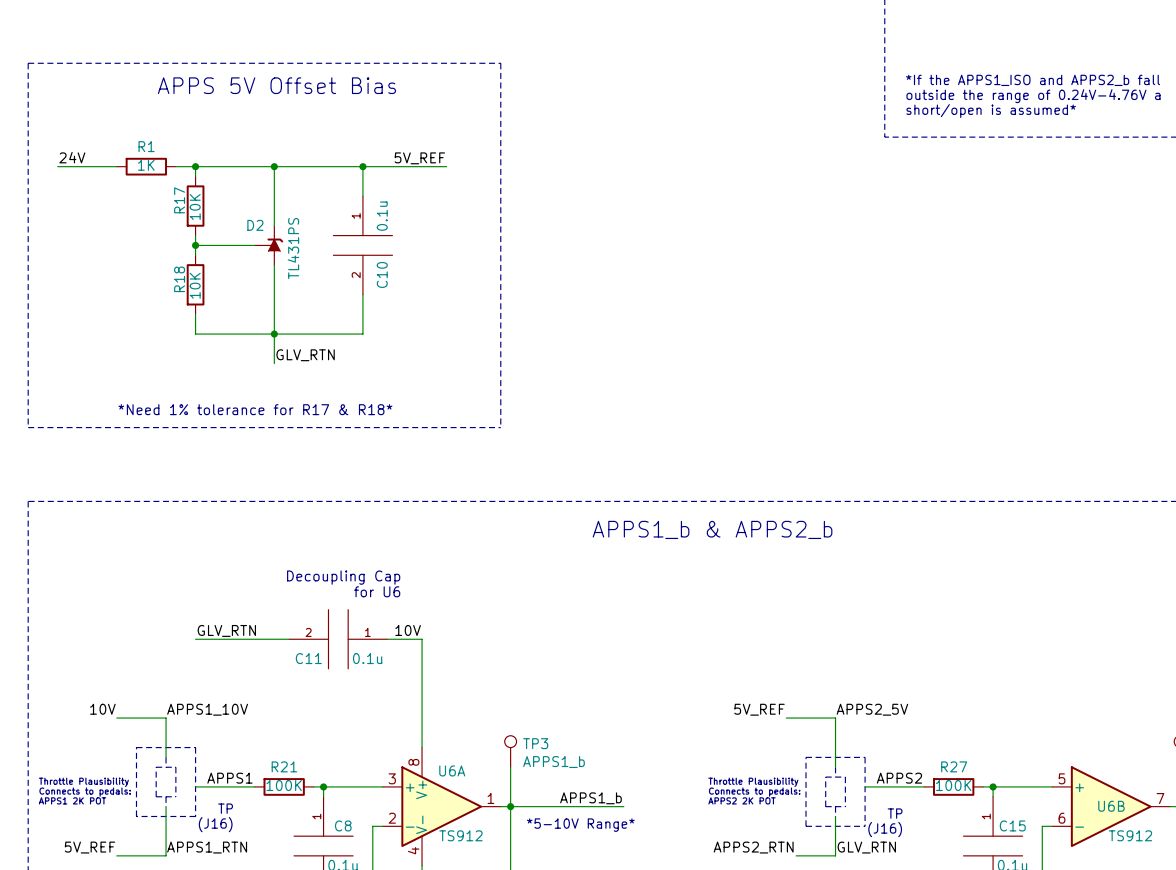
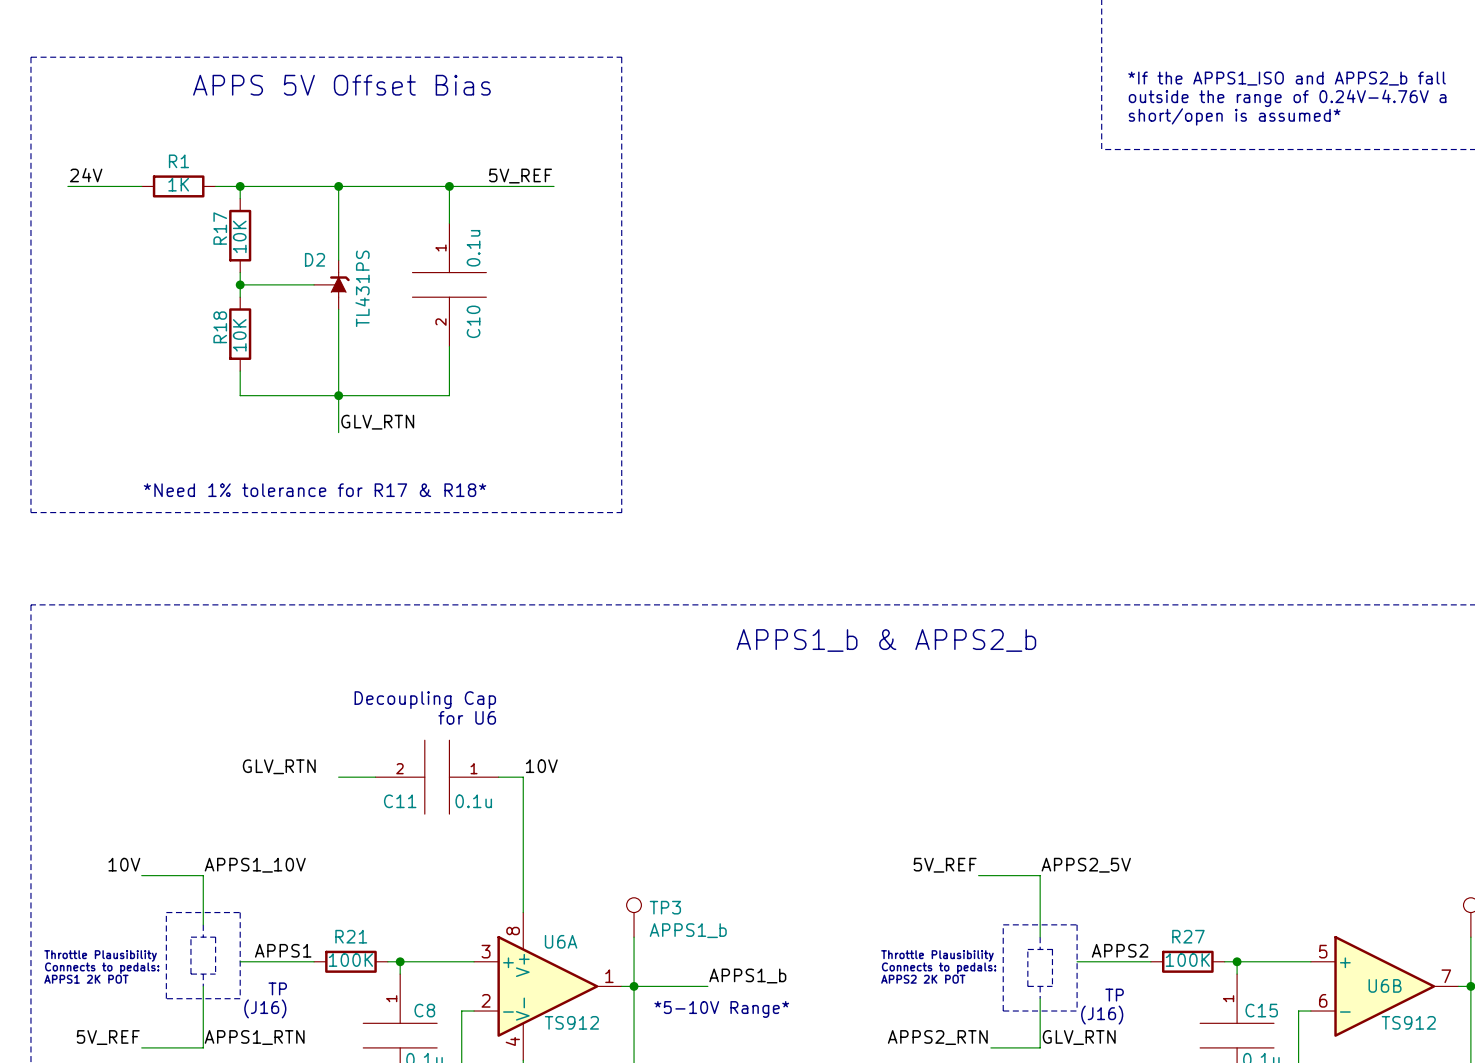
label position: 10V (408, 630) -> 10V (541, 766)
wire: (195, 639) (274, 639) -> none
C11 position: (338, 639) -> (437, 777)
label position: APPS1_b (590, 798) -> APPS1_b (747, 975)
wire: (569, 806) (623, 806) -> none

